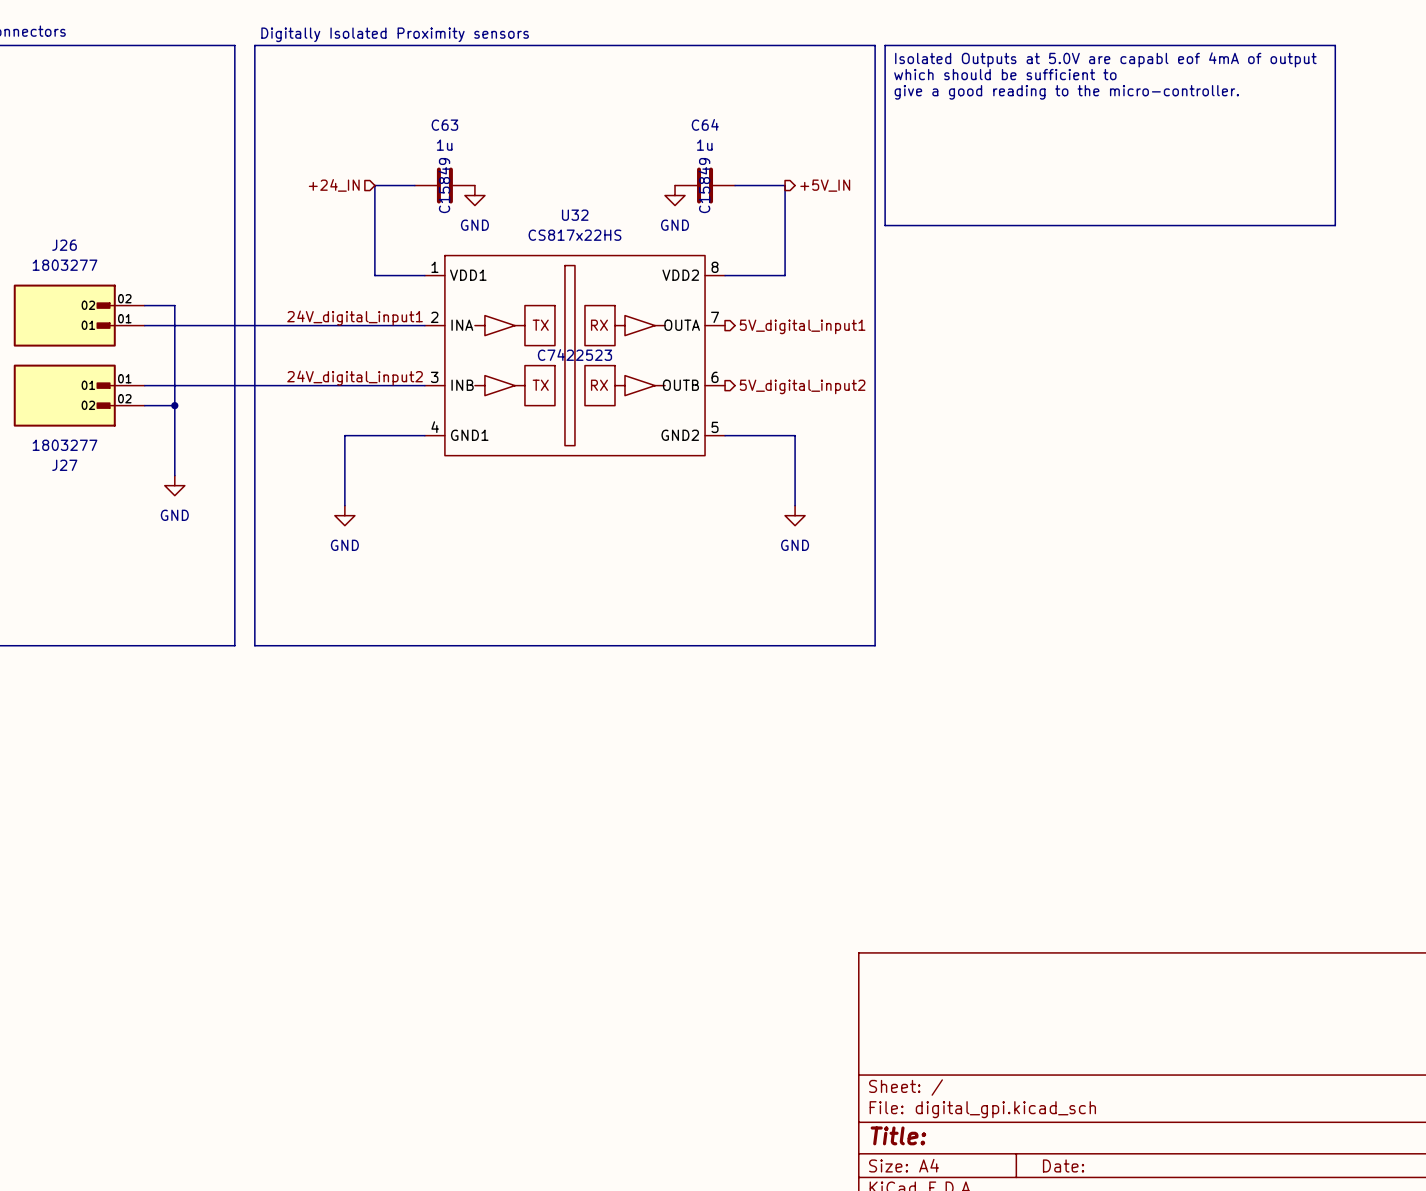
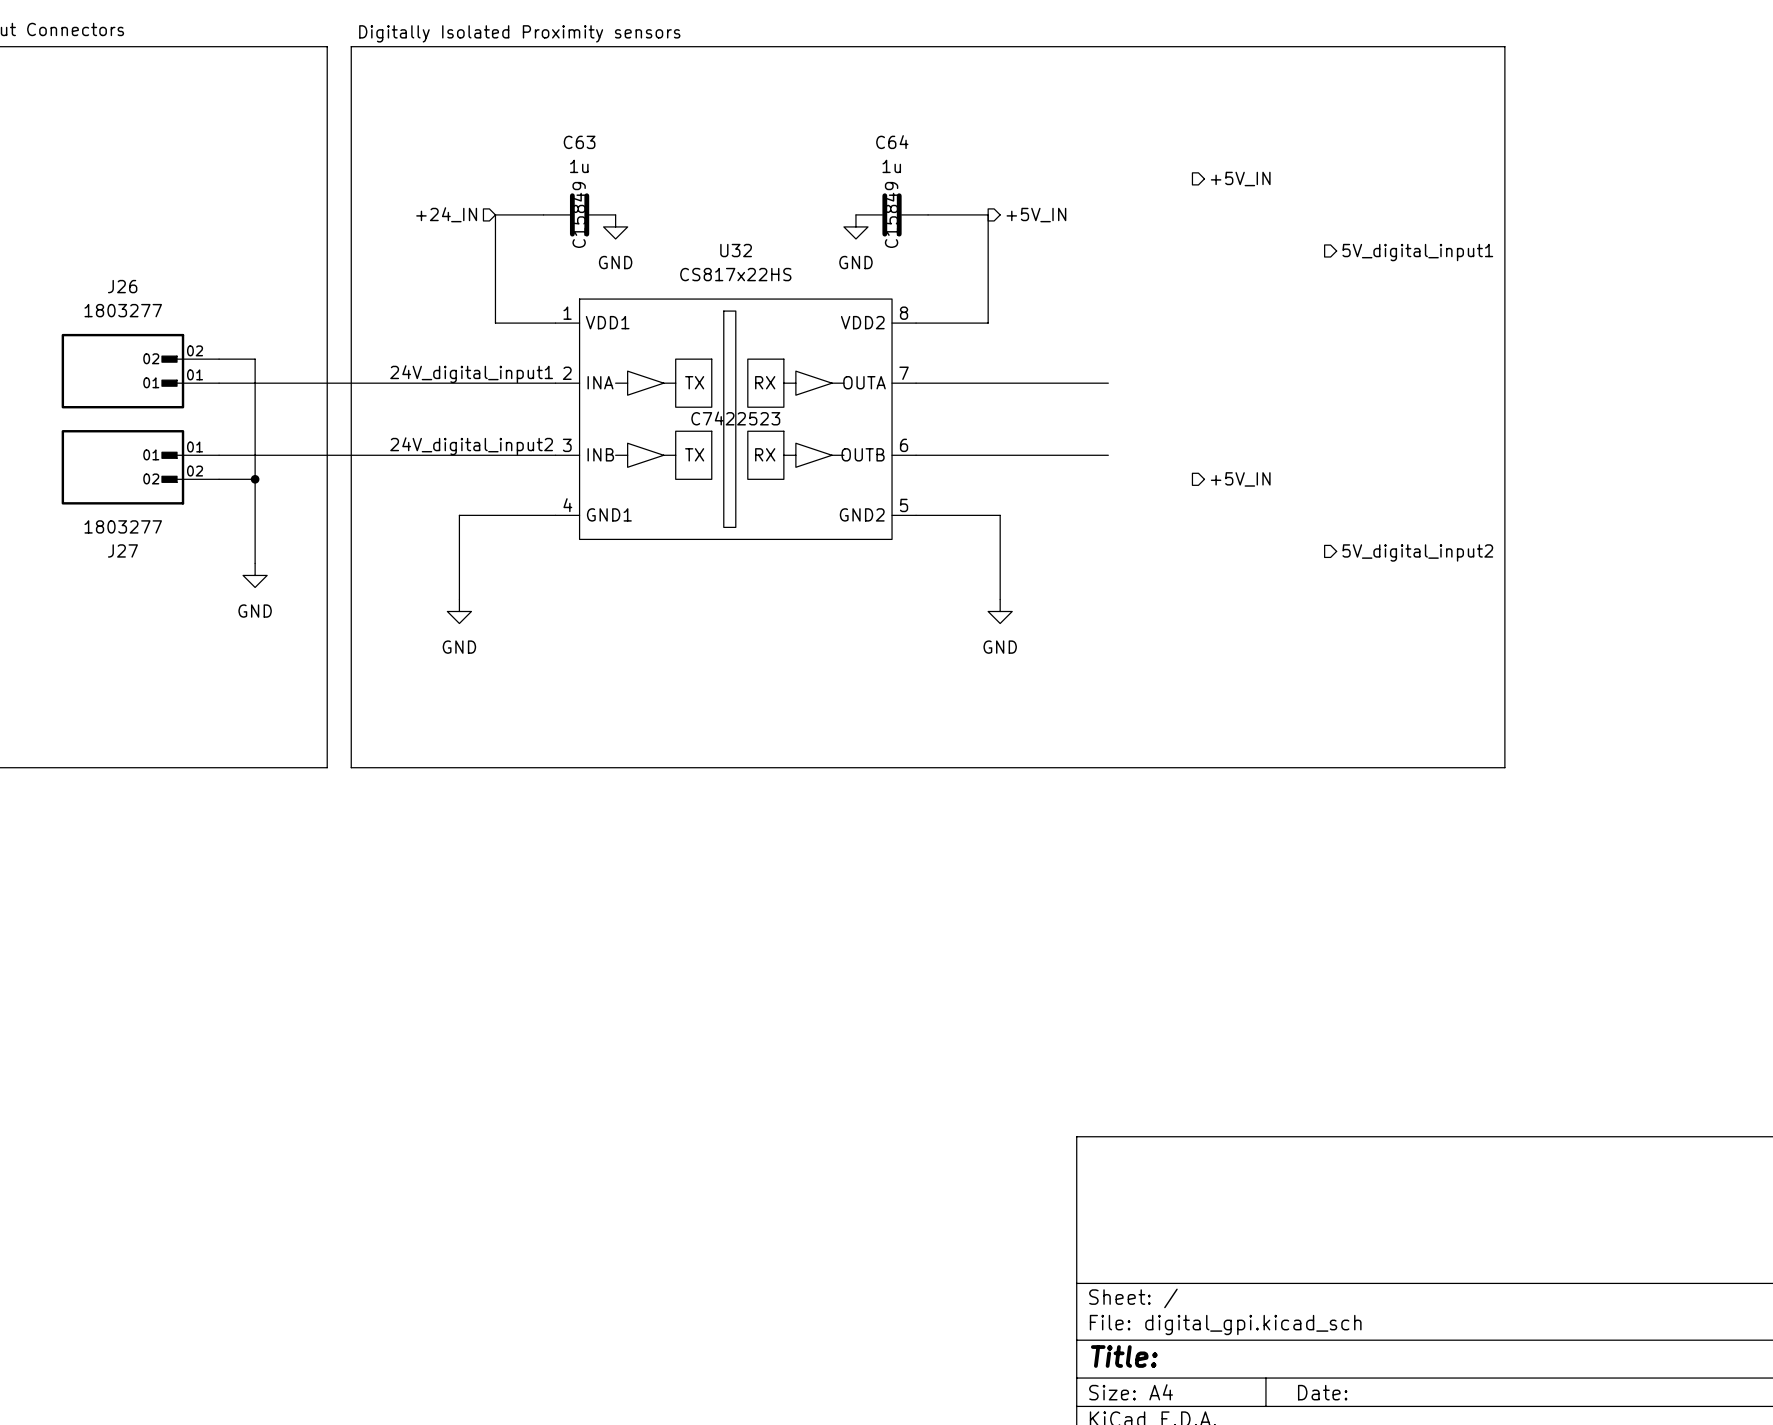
line: (875, 45) (875, 645) -> (1504, 46) (1504, 767) (1096, 767)
line: (885, 45) (885, 225) (1335, 225) (1335, 45) (1215, 45) -> (1108, 46) (1096, 46)
text: Isolated Outputs at 5.0V are capabl eof 4mA of output (1105, 59) -> none
text: which should be sufficient to (1005, 74) -> none
text: give a good reading to the micro-controller. (1066, 92) -> none
hierarchical label: none -> +5V_IN (1240, 179)
hierarchical label: none -> 5V_digital_input1 (1417, 252)
wire: none -> (916, 383) (1108, 383)
hierarchical label: 5V_digital_input1 (802, 326) -> none
wire: none -> (916, 455) (1108, 455)
hierarchical label: 5V_digital_input2 (802, 386) -> none
hierarchical label: none -> +5V_IN (1240, 479)
hierarchical label: none -> 5V_digital_input2 (1417, 552)

